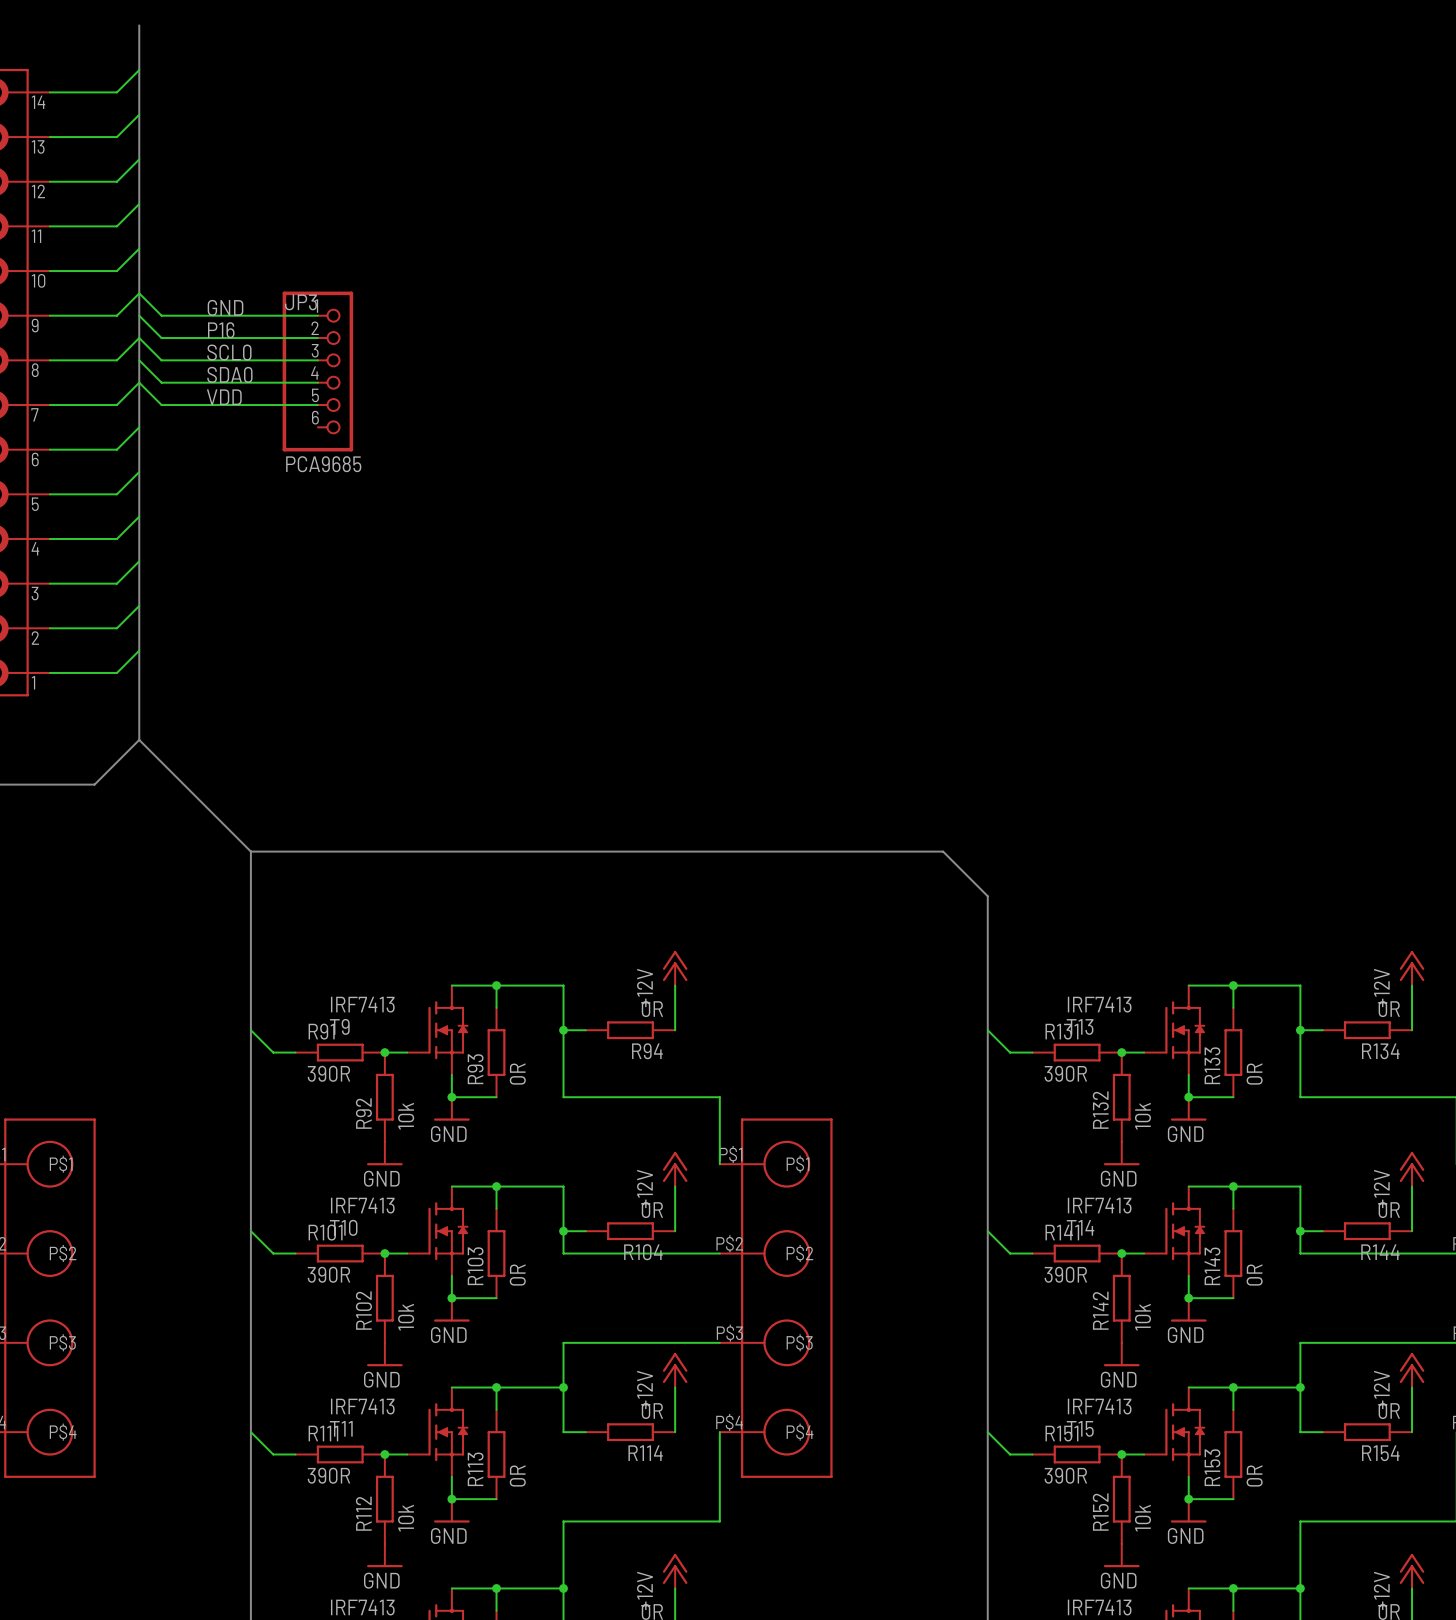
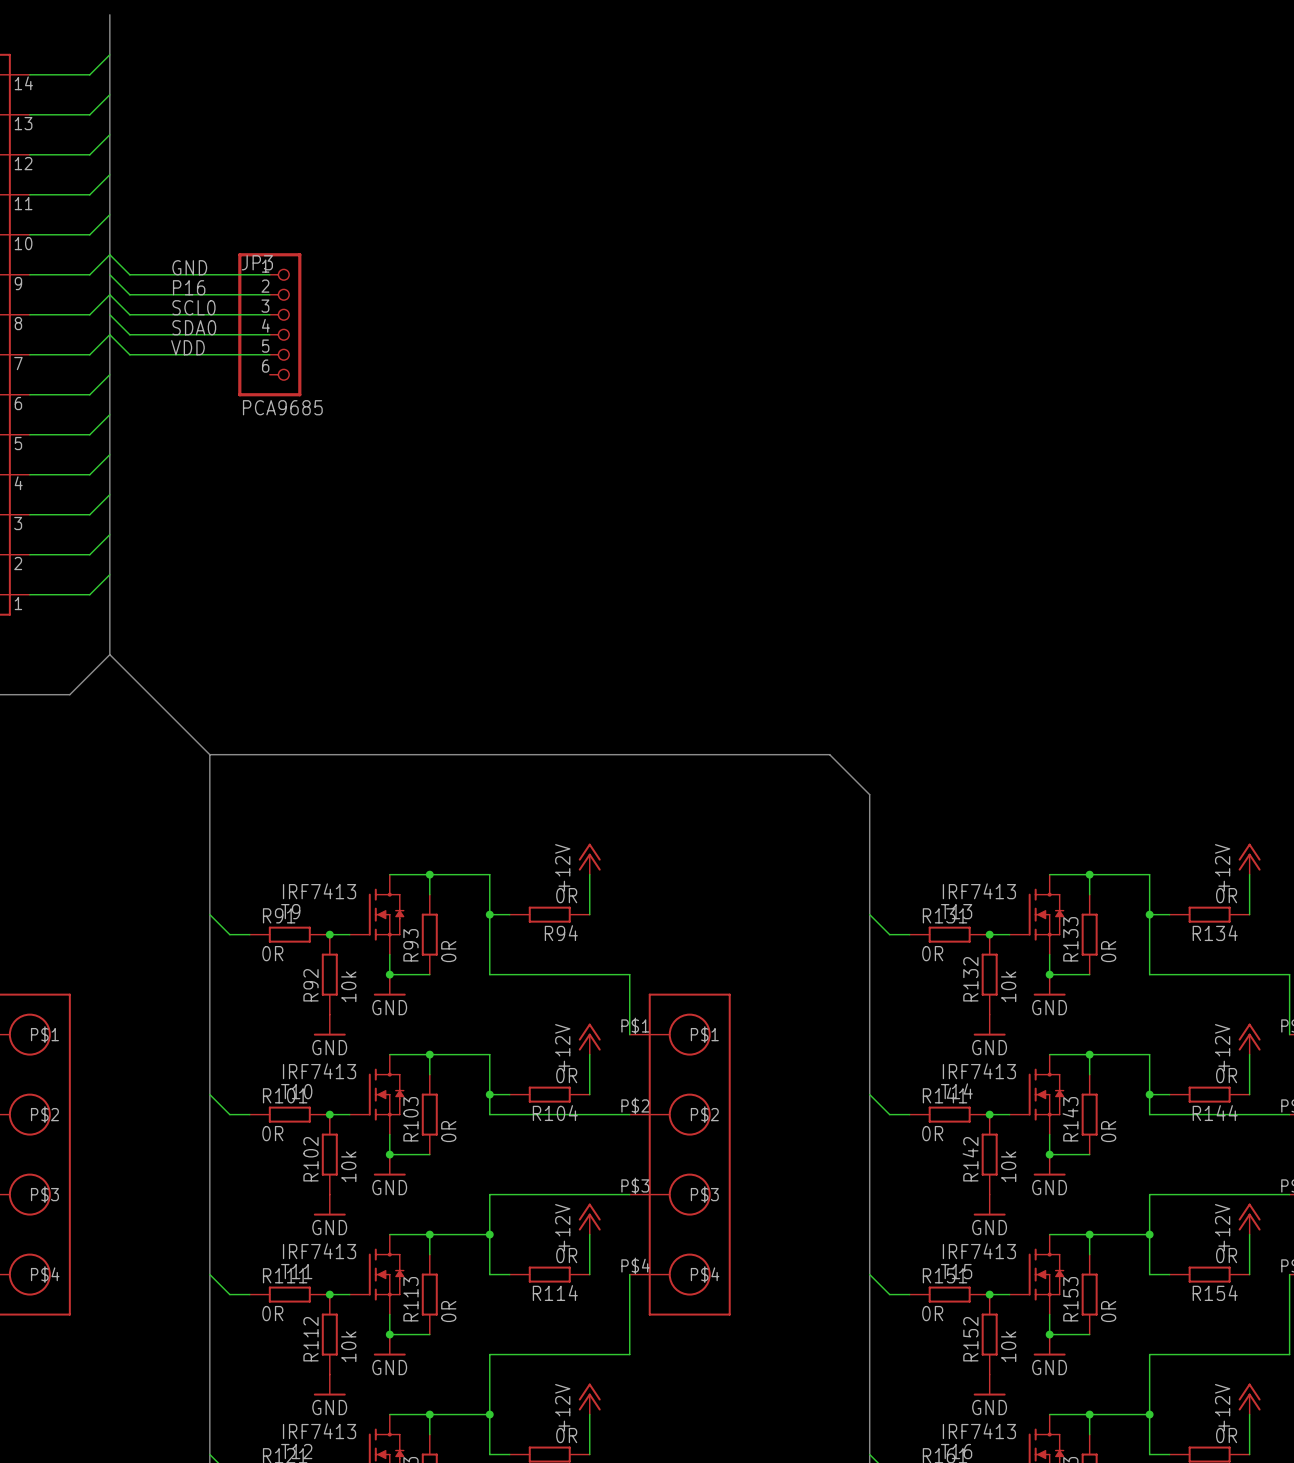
R91 value: 390R (328, 1073) -> 0R (272, 953)
R131 value: 390R (1065, 1073) -> 0R (932, 953)
R101 value: 390R (328, 1274) -> 0R (272, 1133)
R141 value: 390R (1065, 1274) -> 0R (932, 1133)
R111 value: 390R (328, 1475) -> 0R (272, 1313)
R151 value: 390R (1065, 1475) -> 0R (932, 1313)

